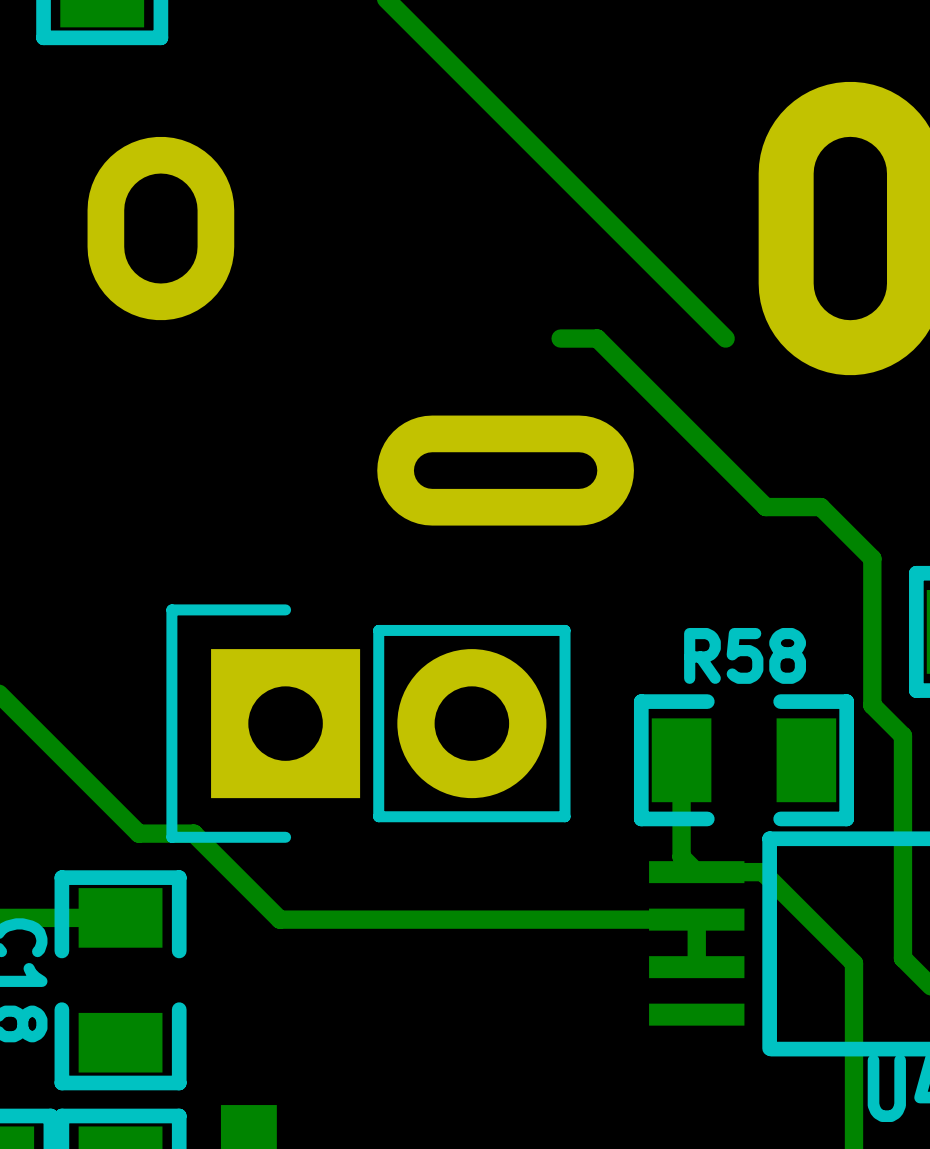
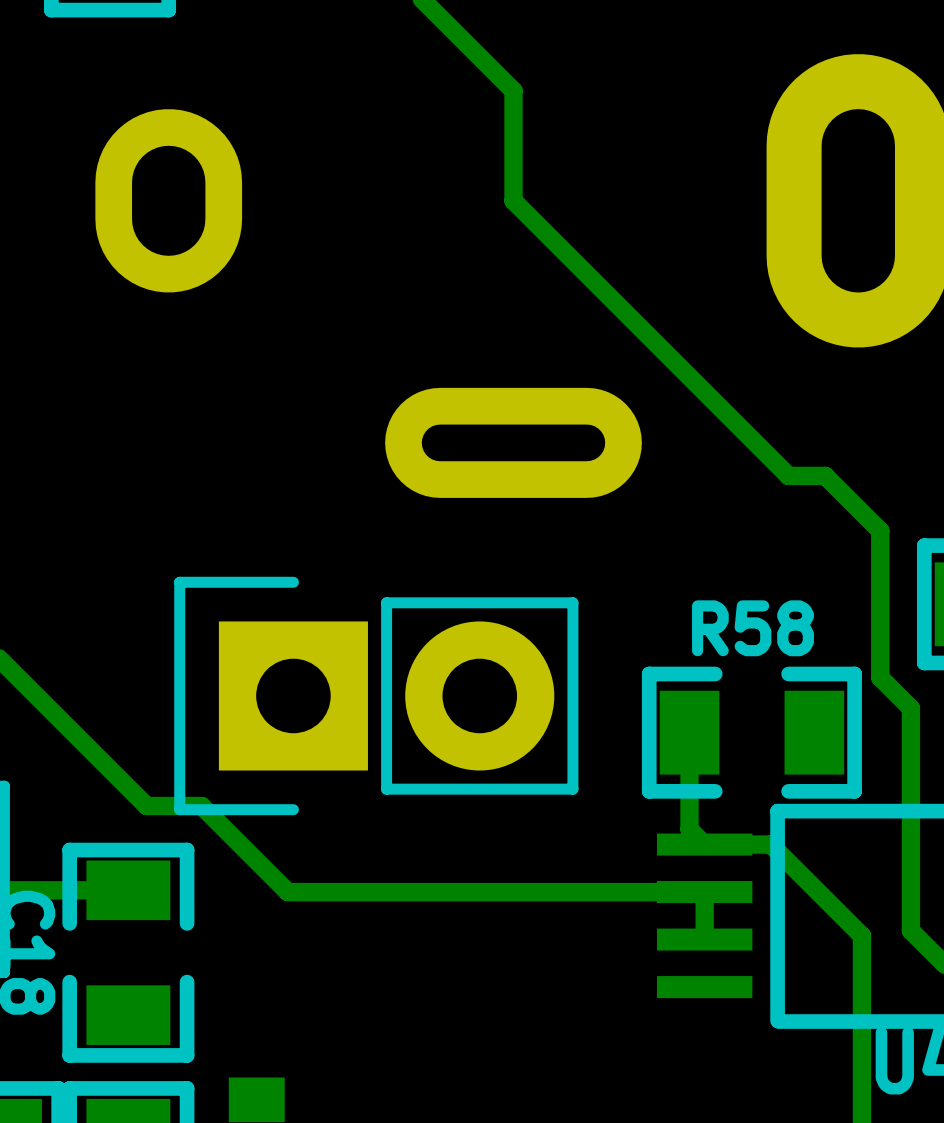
track: (505, 118) (725, 338) -> (513, 90) (513, 200) (788, 475) (825, 475) (828, 479)
track: (560, 338) (597, 338) (765, 507) (820, 507) -> none

